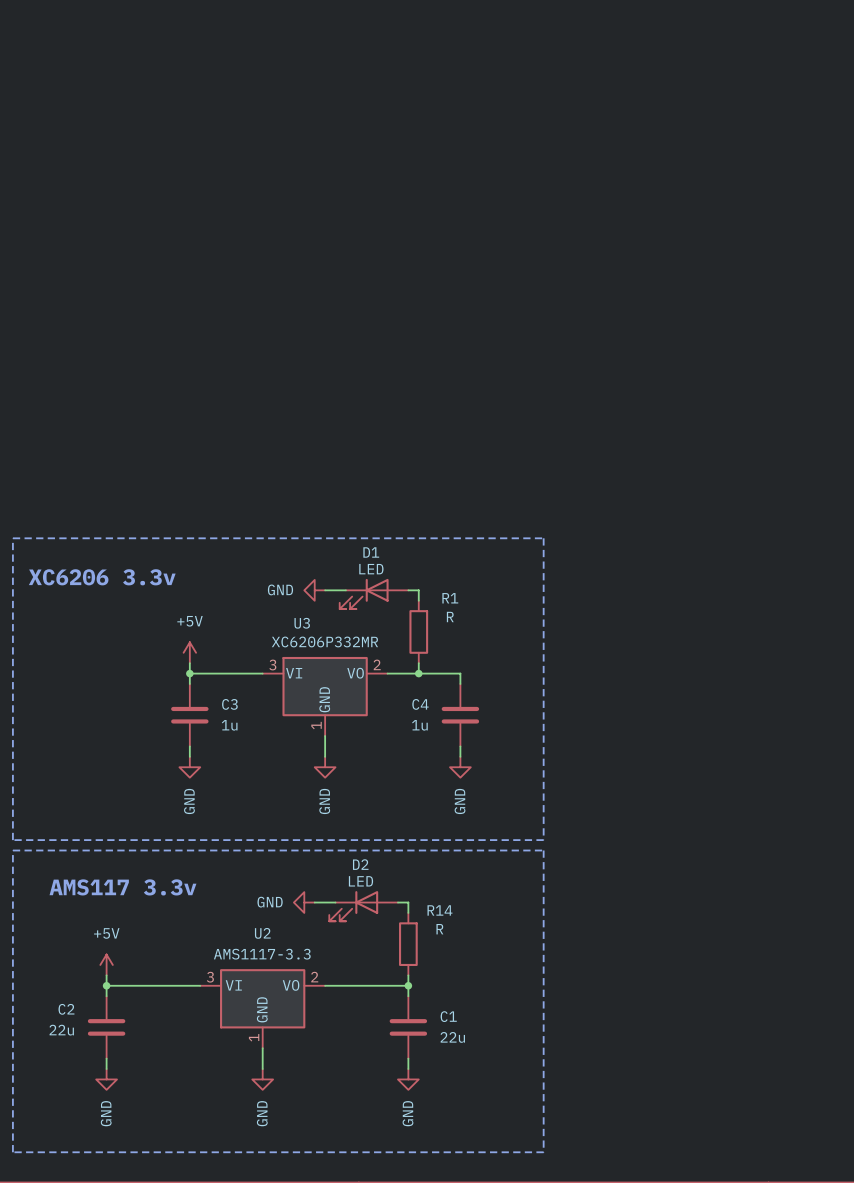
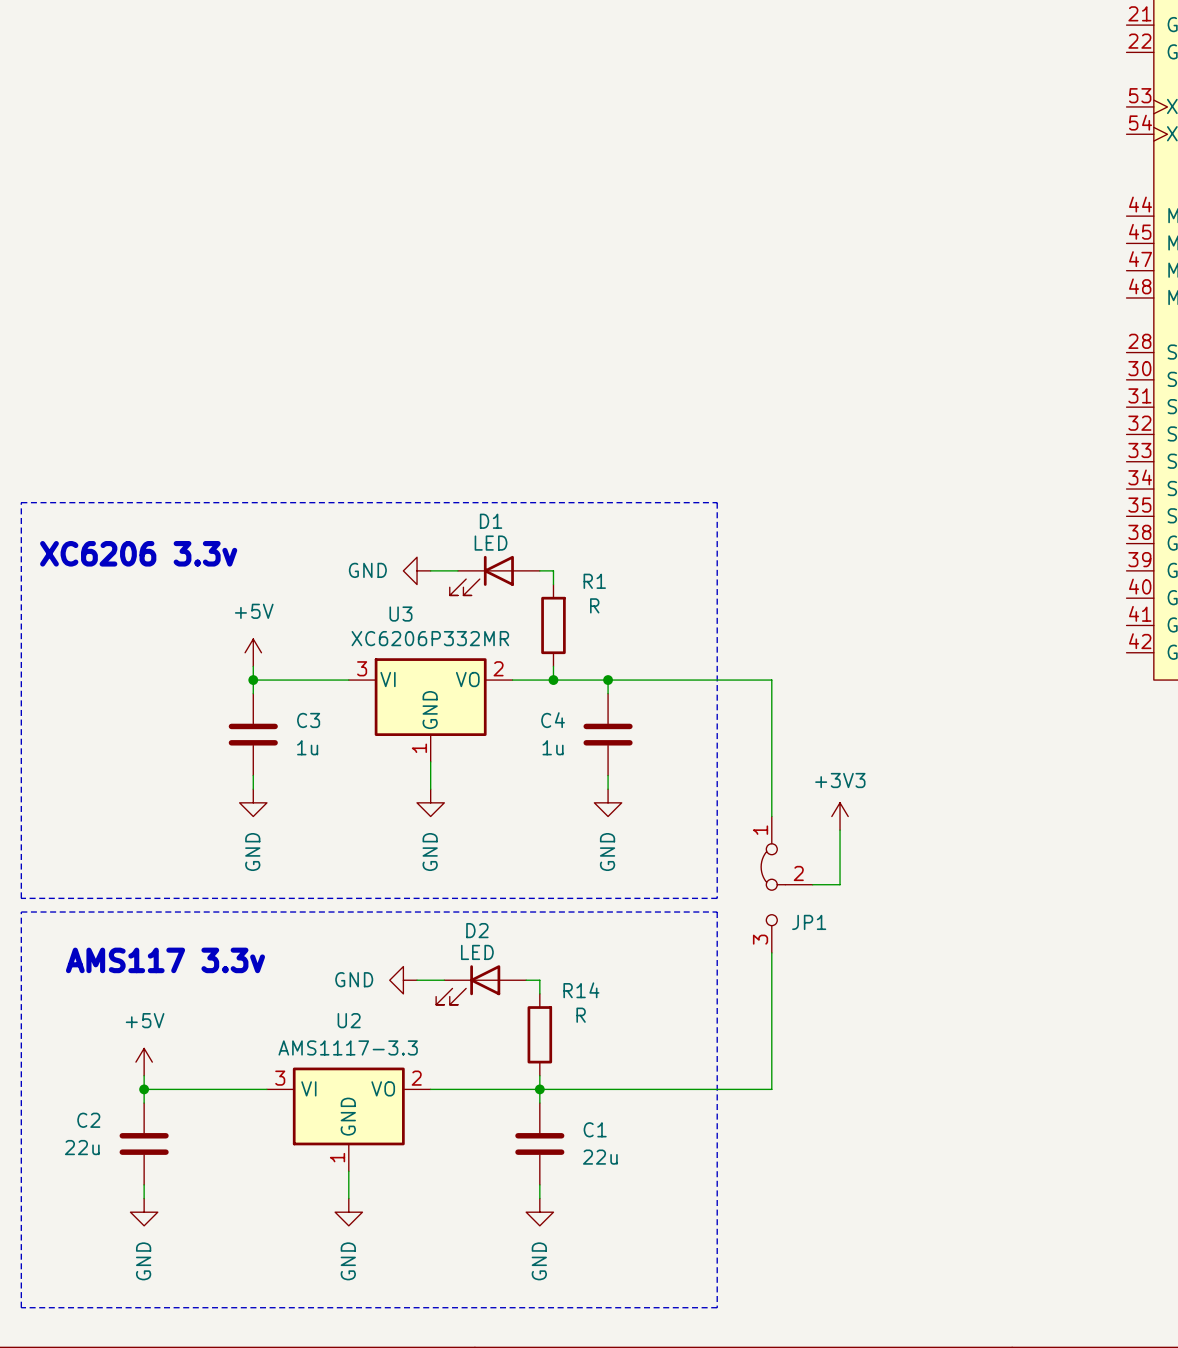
wire: none -> (608, 680) (771, 680) (771, 816)
junction: none -> (608, 680)
power symbol: none -> +3V3 (840, 816)
wire: none -> (840, 830) (840, 884) (812, 884)
JP1: none -> (786, 884)
wire: none -> (771, 952) (771, 1089) (539, 1089)

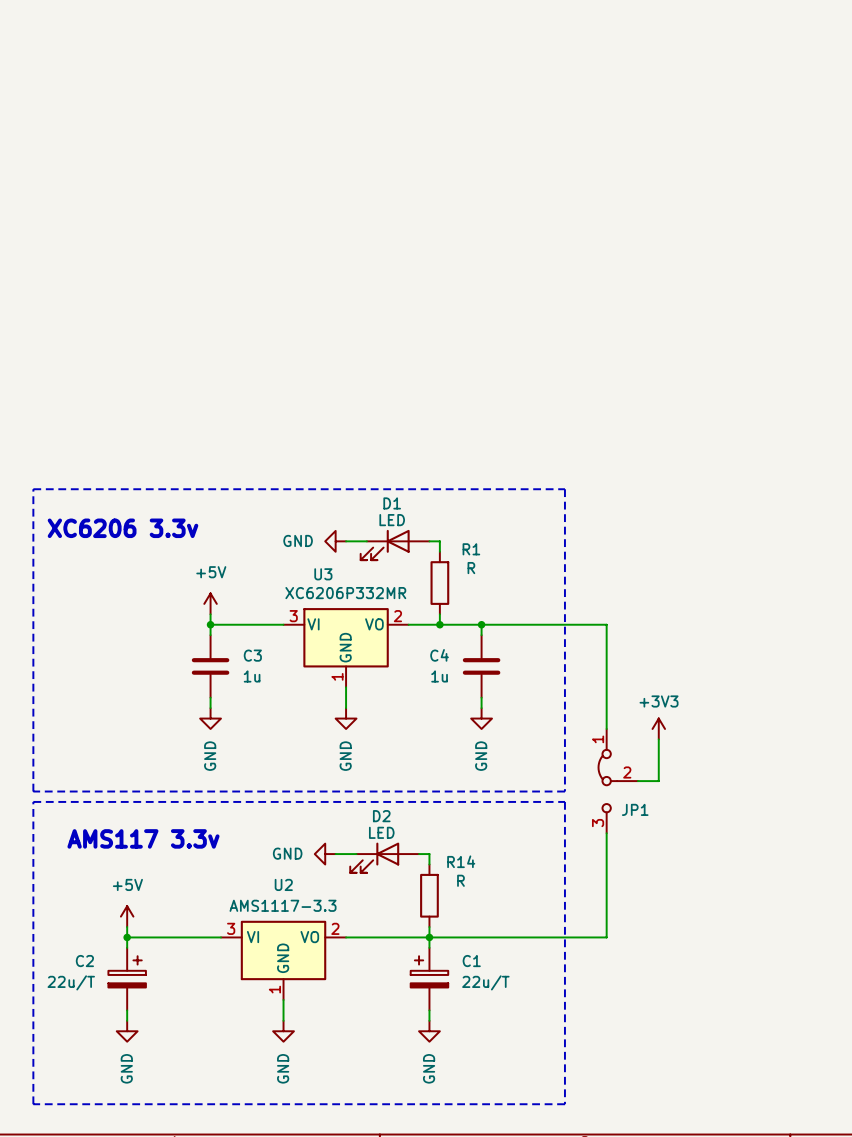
C2 symbol: [119, 1103, 169, 1185] -> [108, 947, 146, 1011]
C1 symbol: [515, 1103, 565, 1185] -> [410, 947, 449, 1011]
C2 value: 22u (82, 1147) -> 22u/T (71, 982)
C1 value: 22u (600, 1157) -> 22u/T (485, 982)

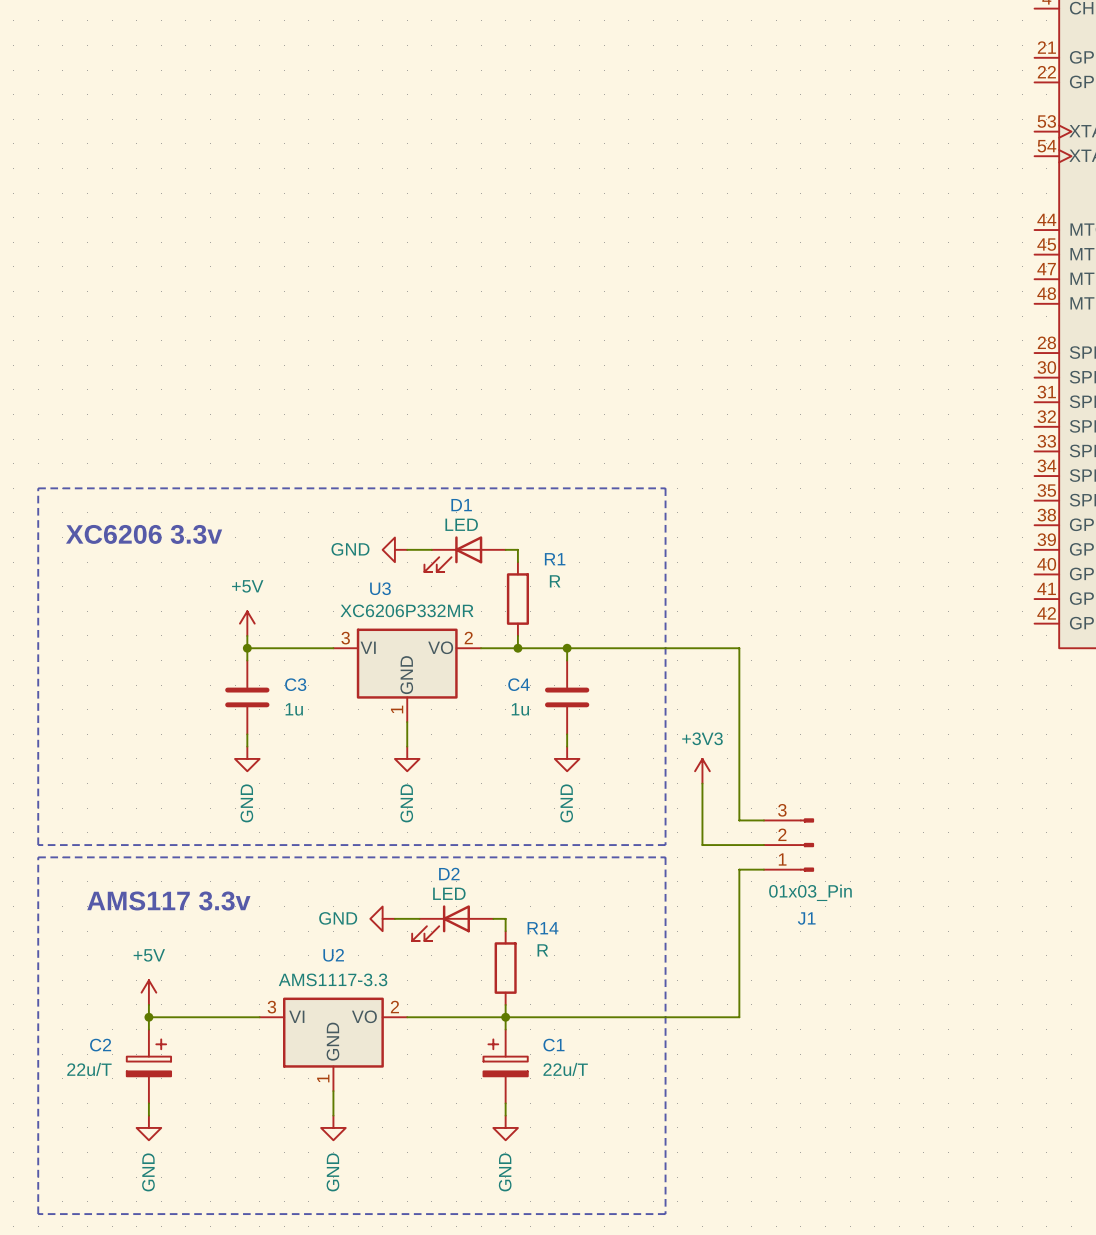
wire: (606, 624) (606, 728) -> (714, 648) (739, 648) (739, 820) (763, 820)
power symbol position: +3V3 (658, 728) -> +3V3 (702, 771)
wire: none -> (702, 783) (702, 845) (763, 845)
wire: (658, 739) (658, 781) (637, 781) -> none
JP1: (618, 781) -> none
J1: none -> 01x03_Pin (788, 845)
wire: (606, 833) (606, 937) -> (763, 869) (739, 869) (739, 1017) (714, 1017)

